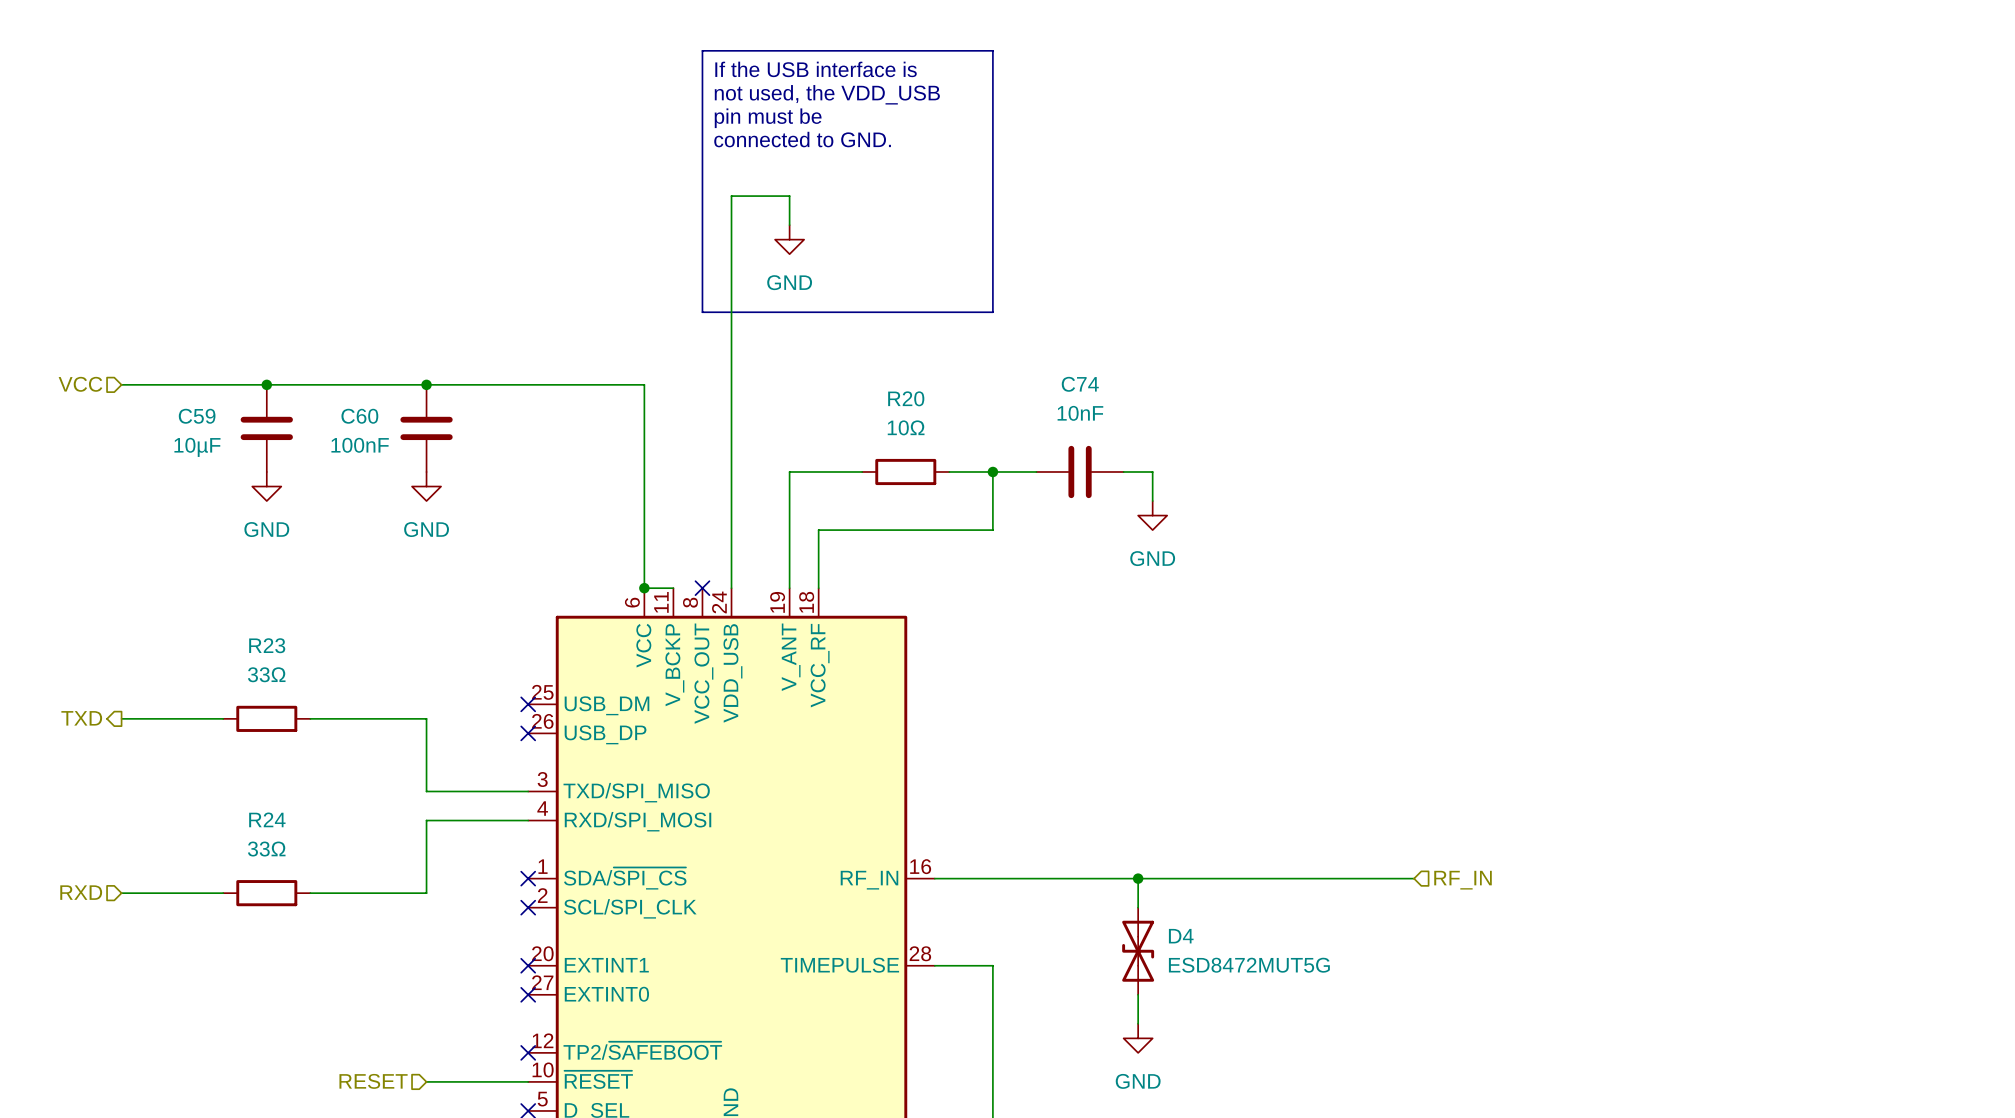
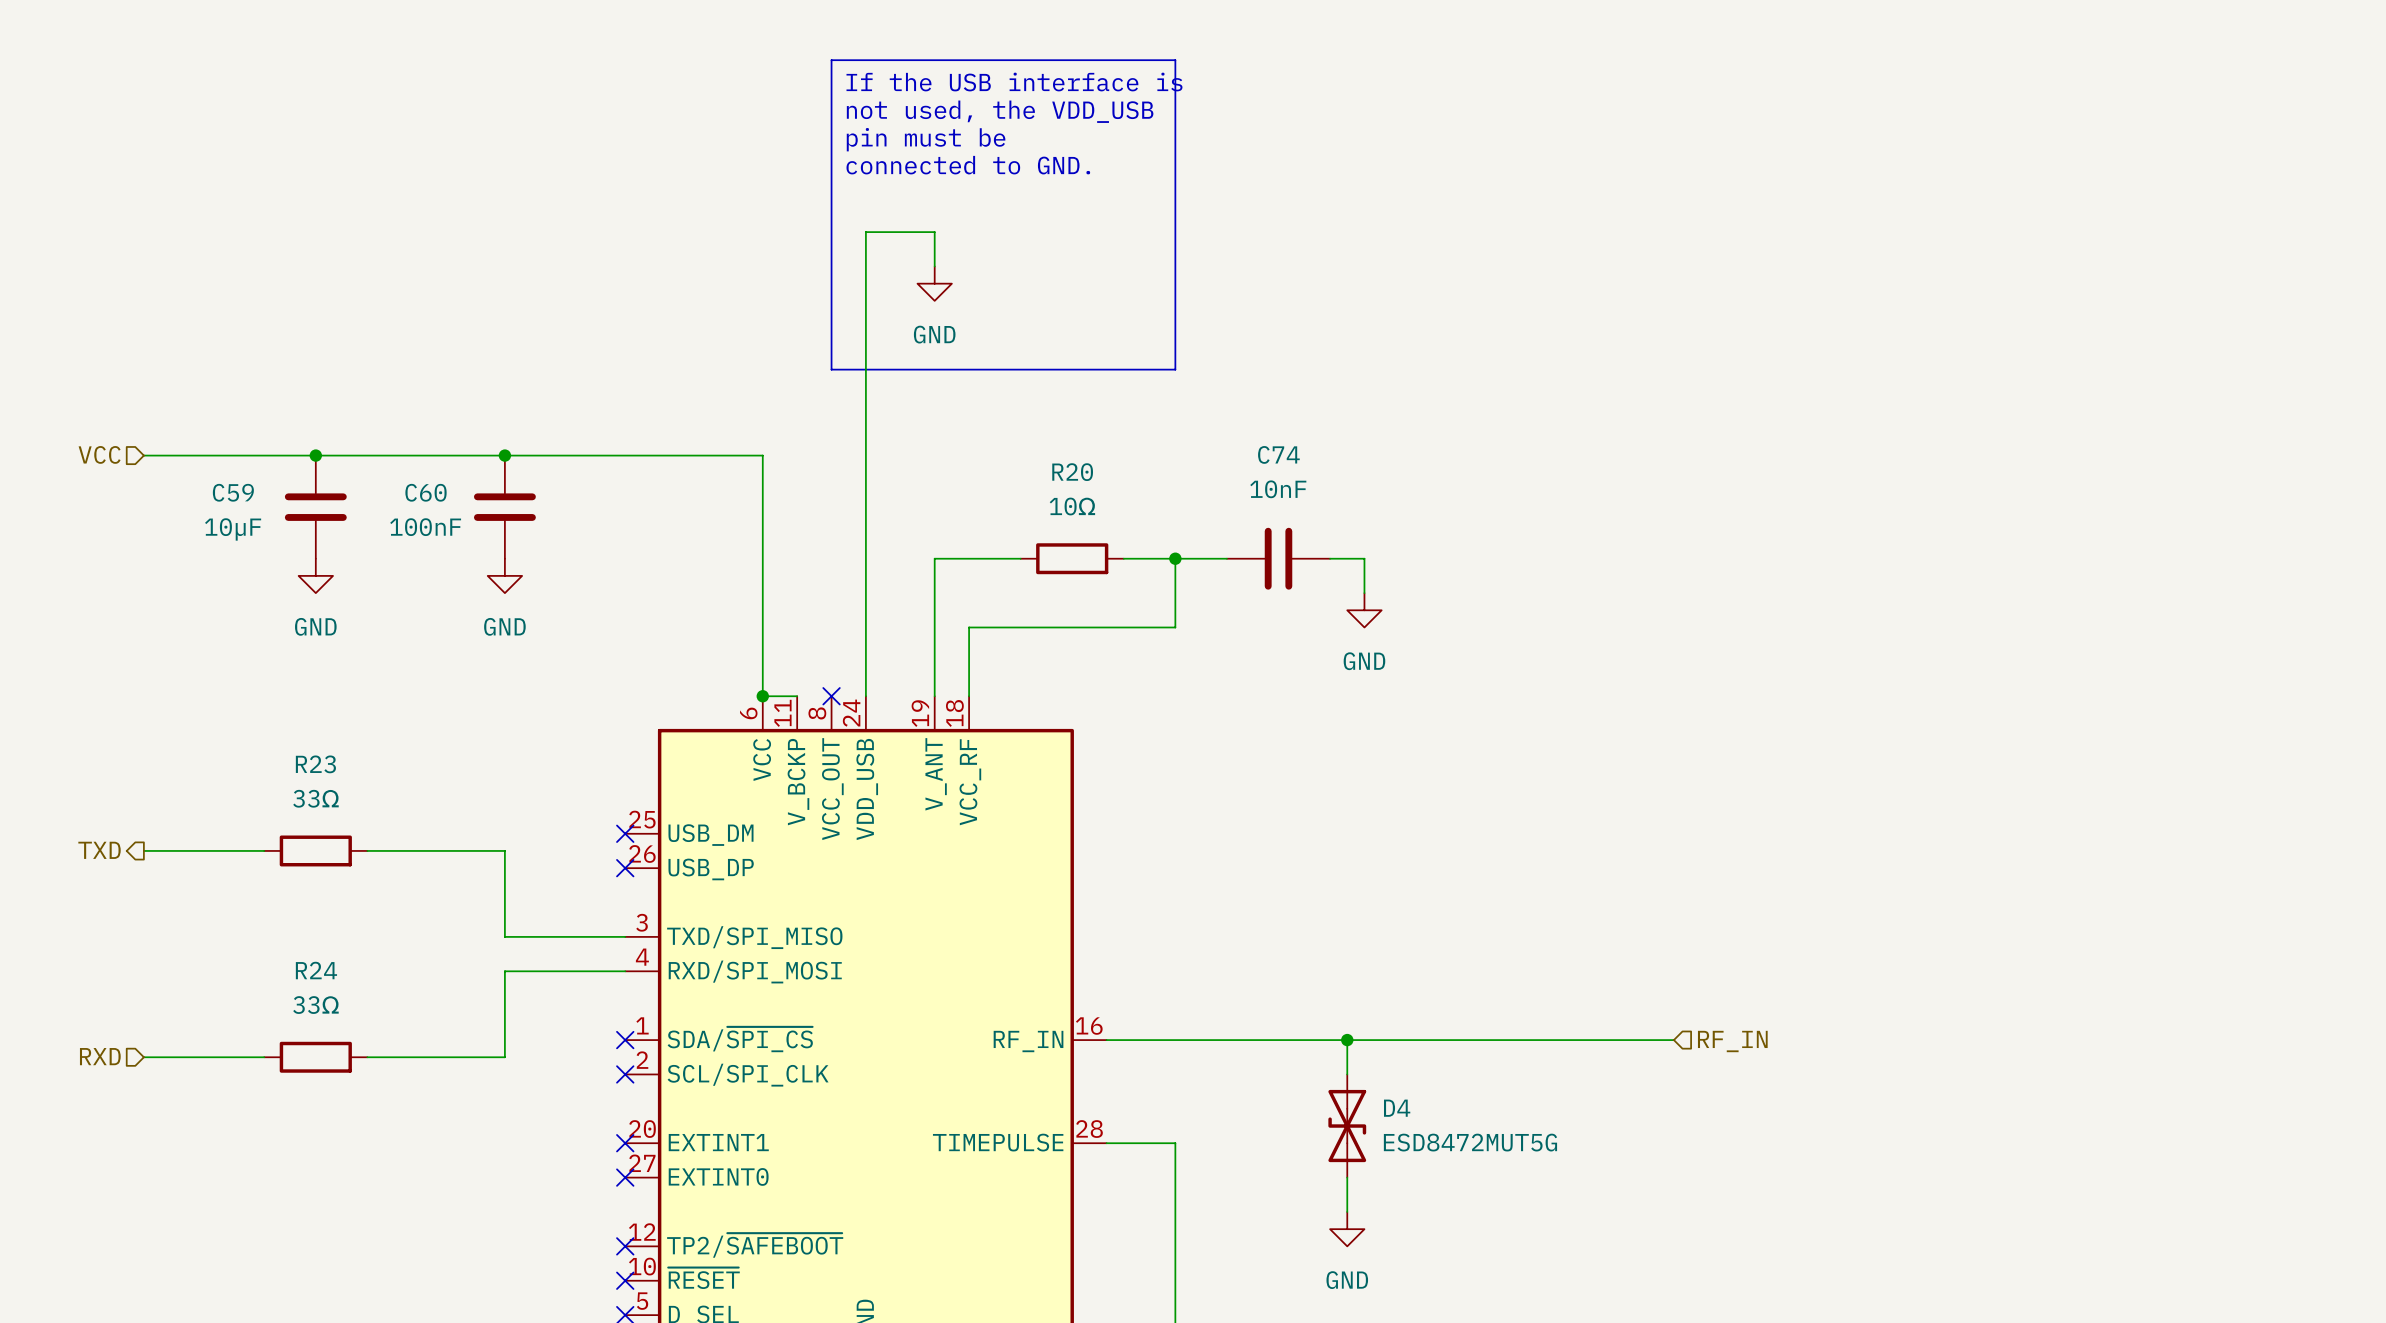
hierarchical label: RESET (373, 1081) -> none
wire: (426, 1081) (528, 1081) -> none
no-connect mark: none -> (625, 1280)

